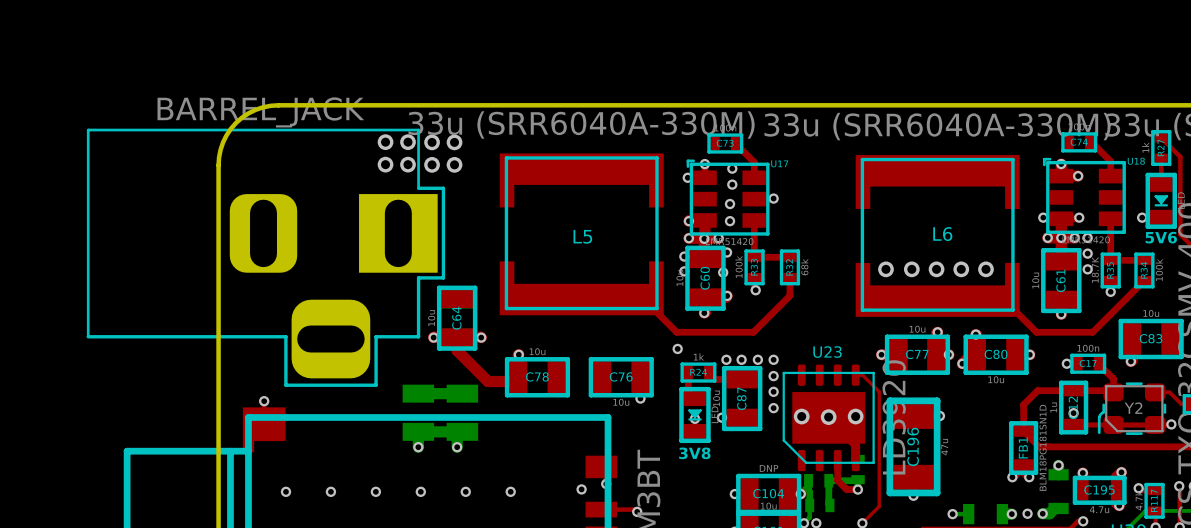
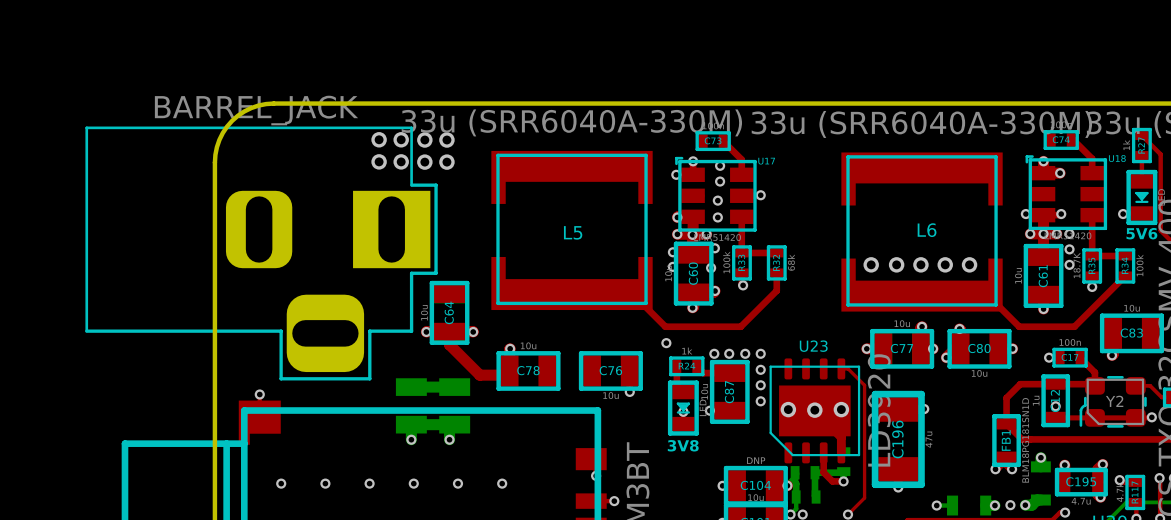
via: (581, 489) -> none
top track: (624, 509) (634, 509) (637, 511) -> none
via: none -> (614, 501)
via: (637, 511) -> none

